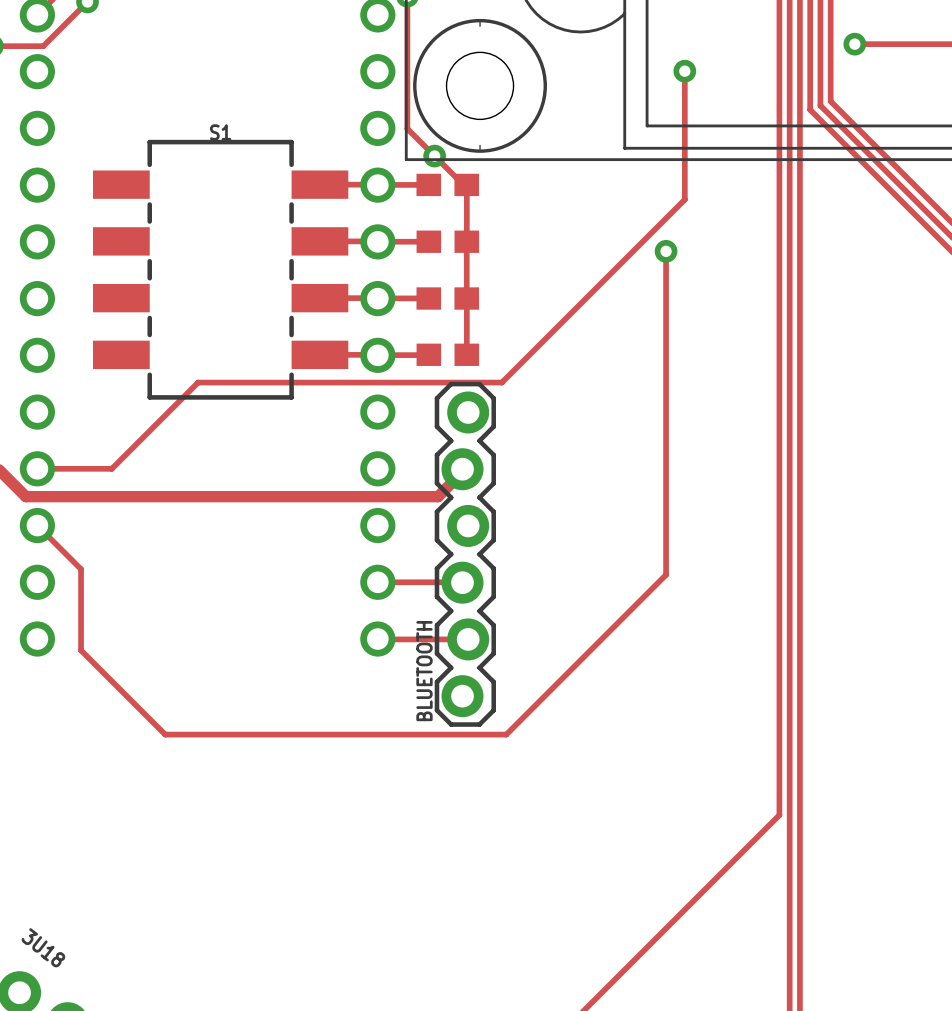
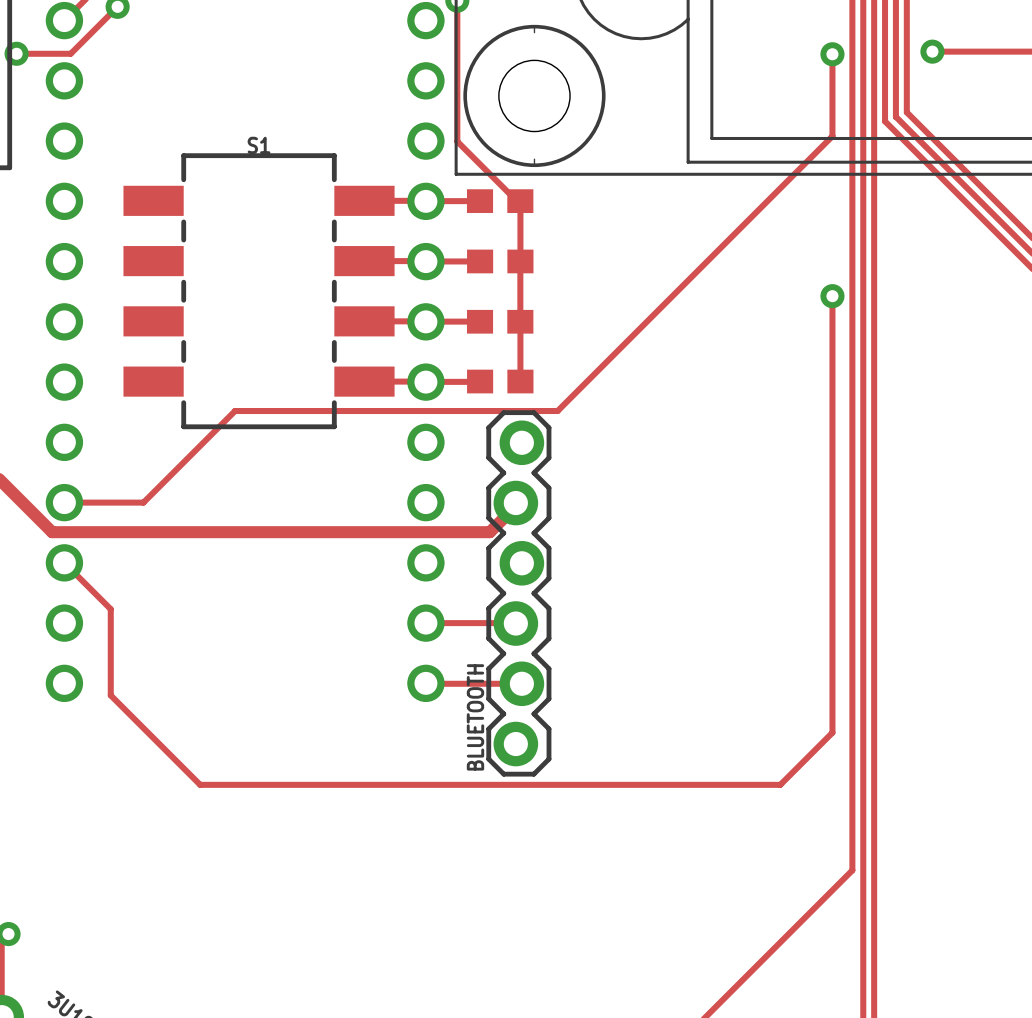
track: (684, 71) (684, 199) -> (832, 54) (832, 136) (751, 216)
via position: (684, 71) -> (832, 54)
via: (434, 156) -> none
track: (666, 251) (666, 574) (506, 734) -> (832, 296) (832, 732) (780, 784) (562, 784)
via position: (666, 251) -> (832, 296)

